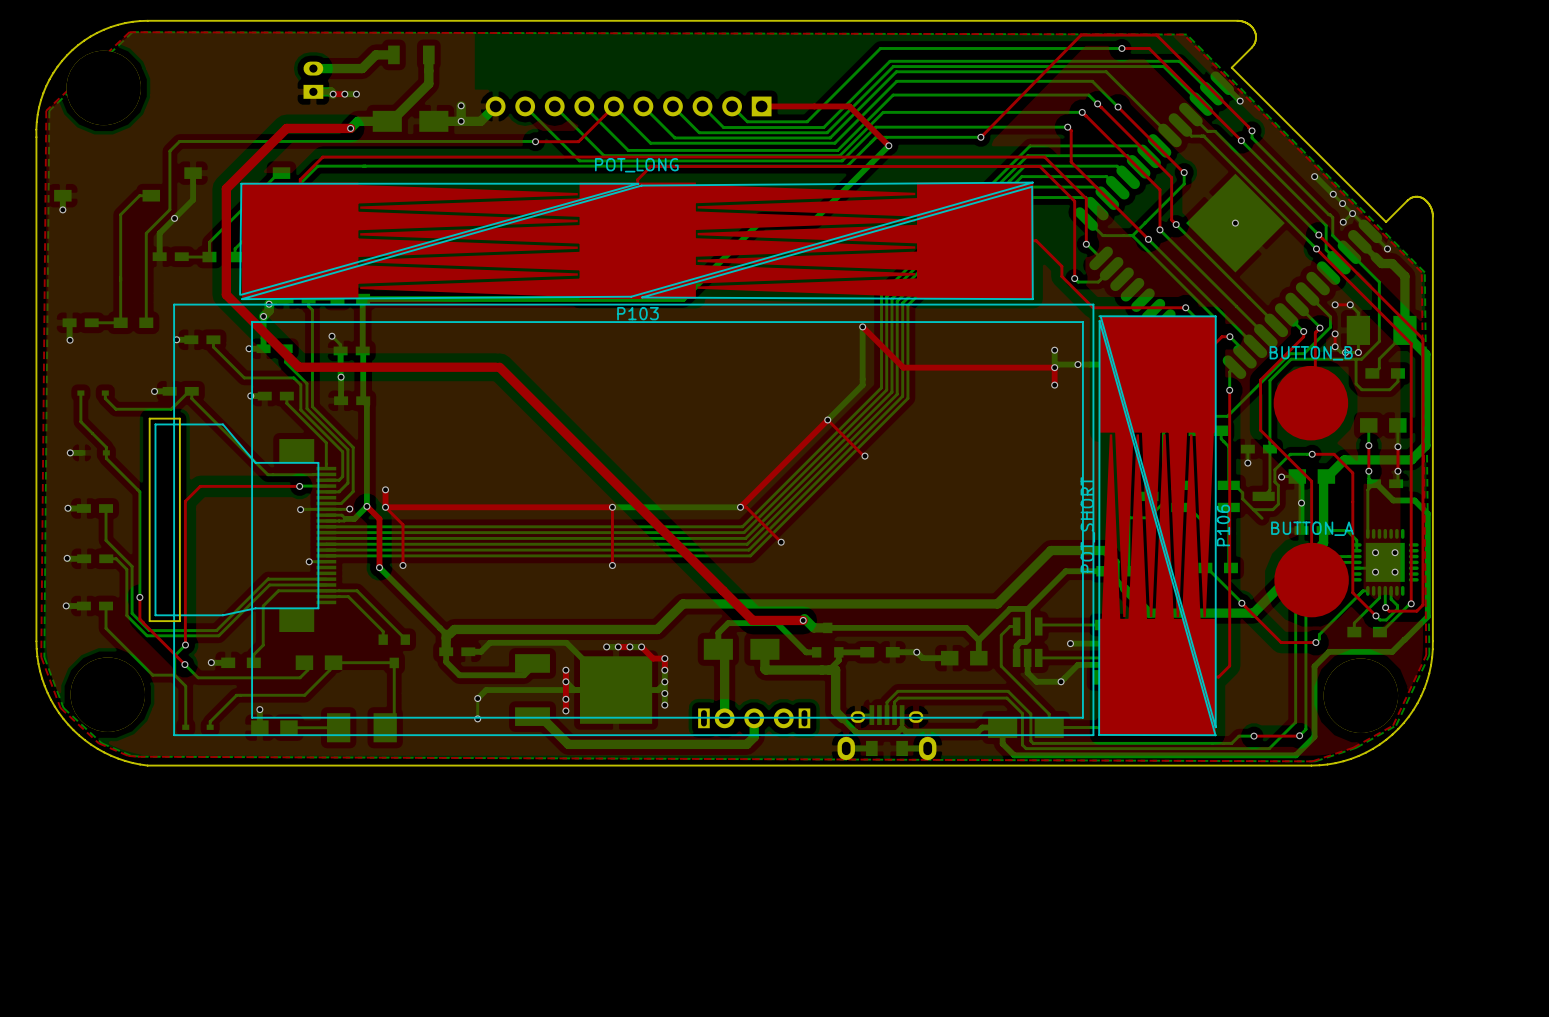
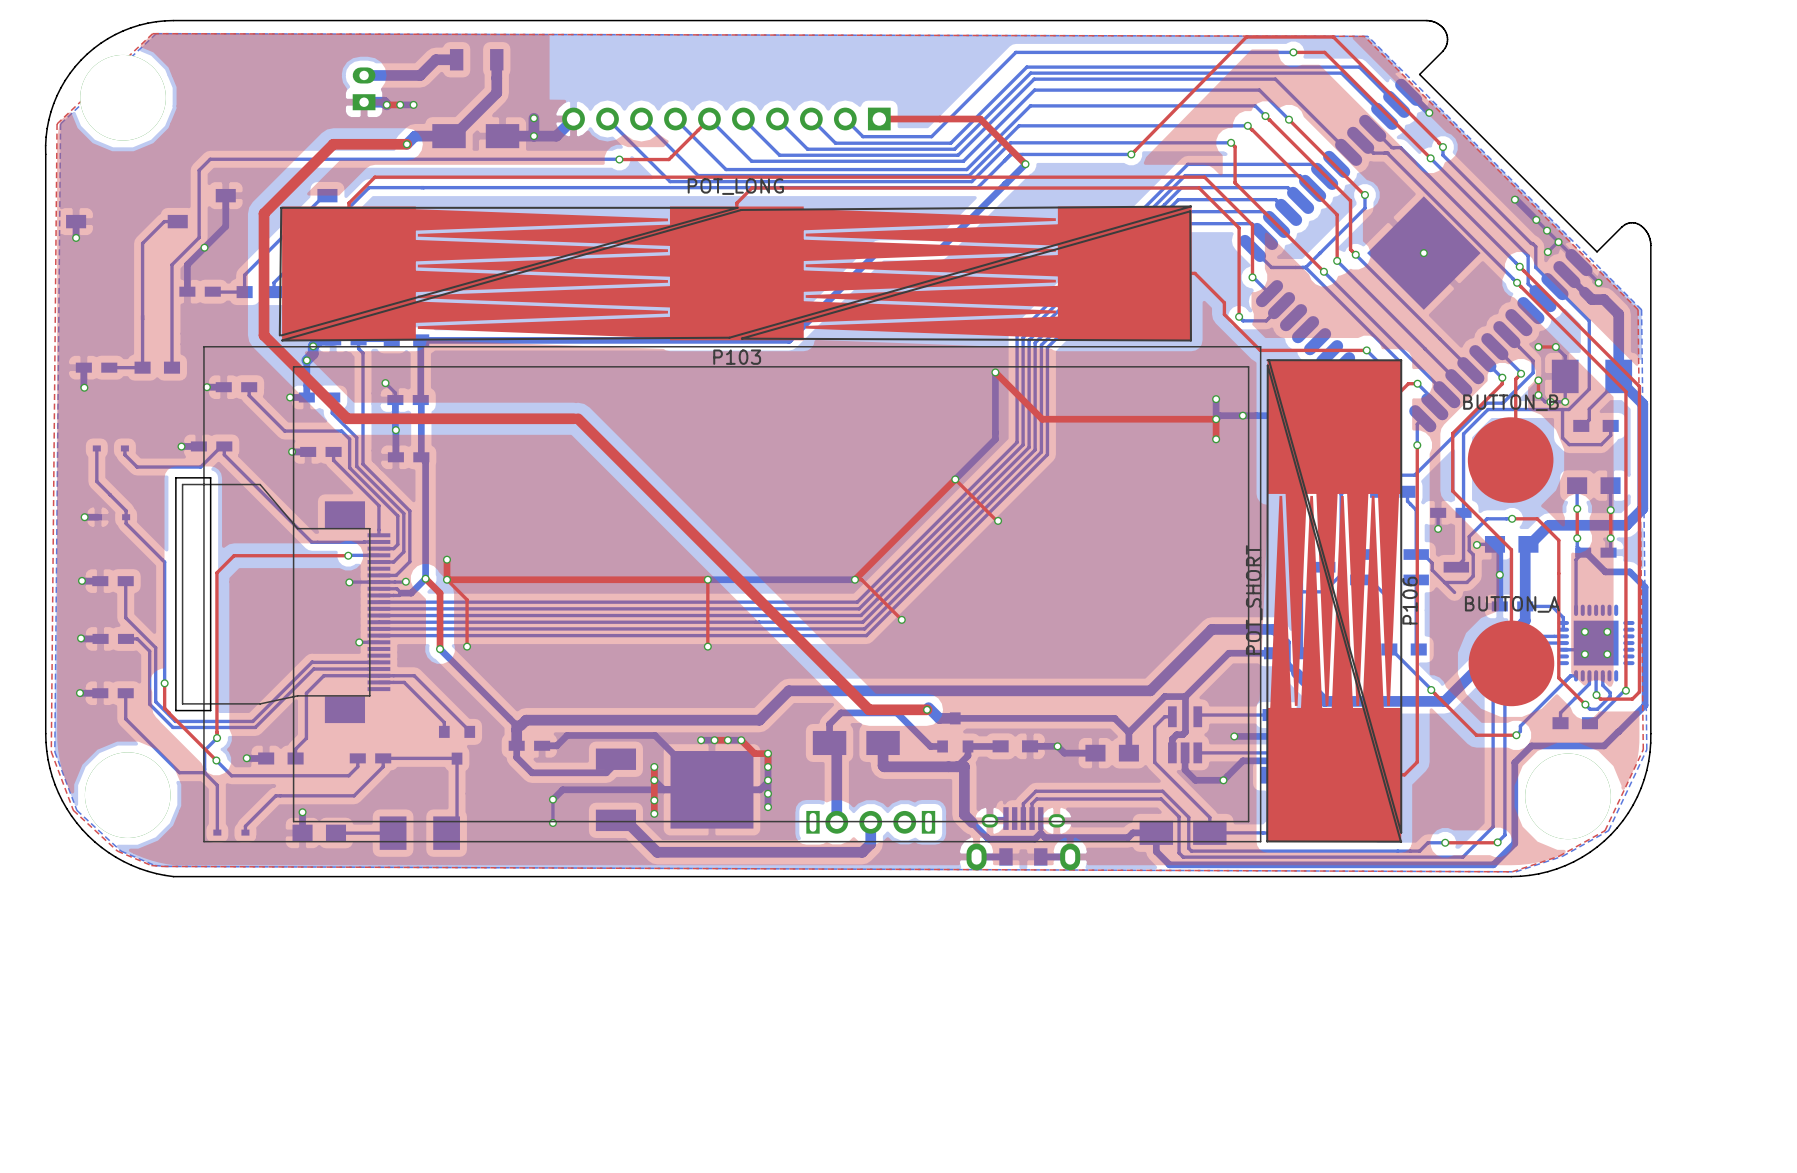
part footprint: [295, 655, 343, 670] -> [349, 753, 392, 764]

